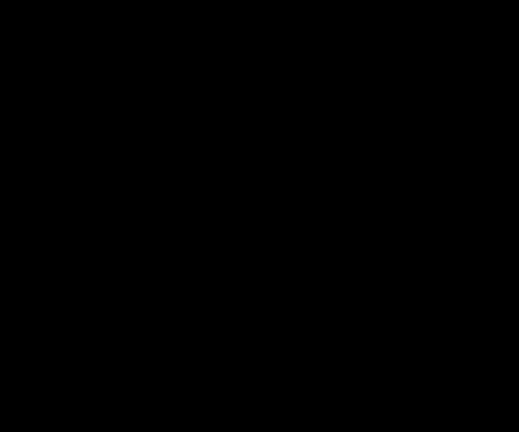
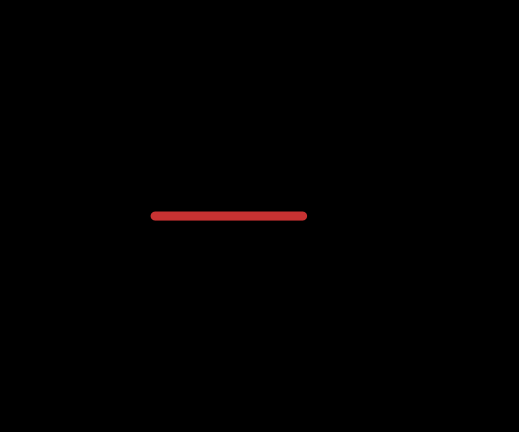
top track: none -> (302, 216) (155, 216)

